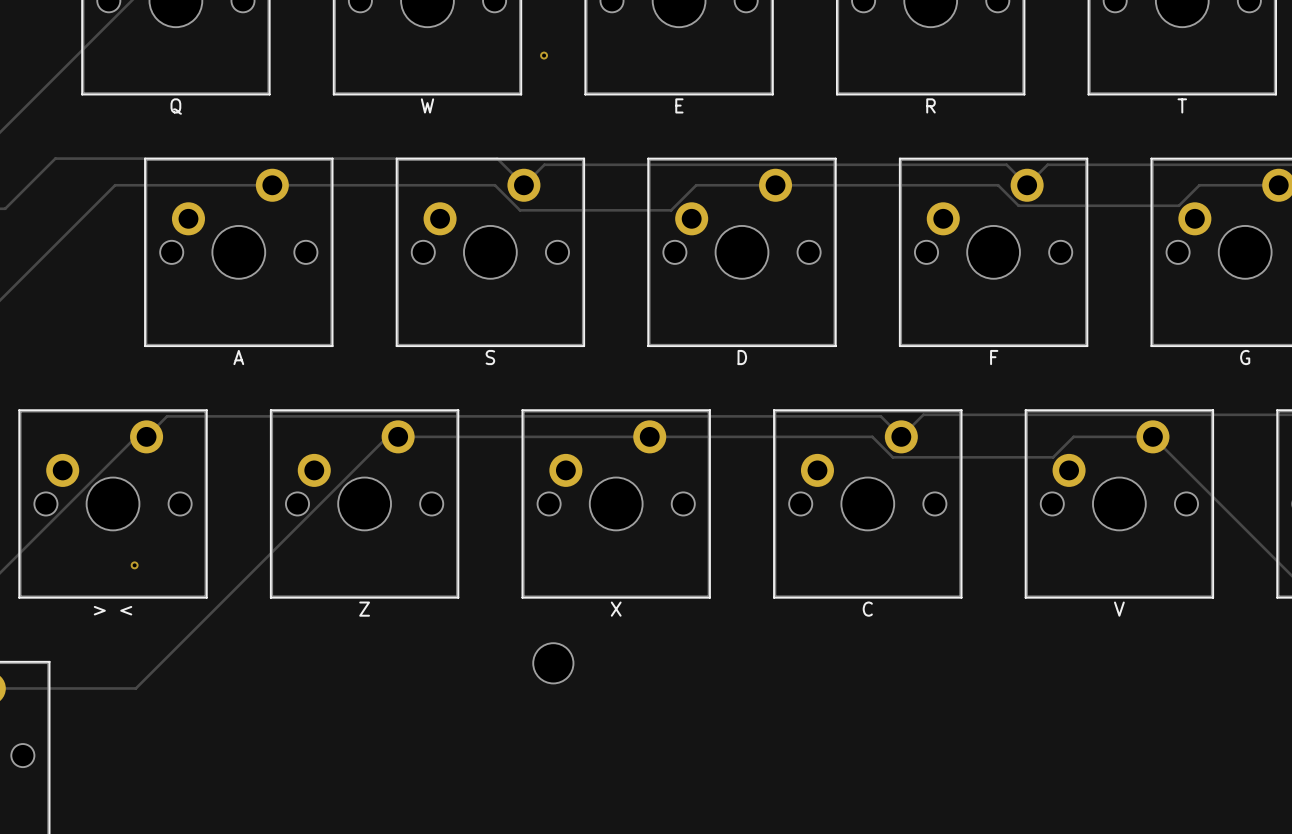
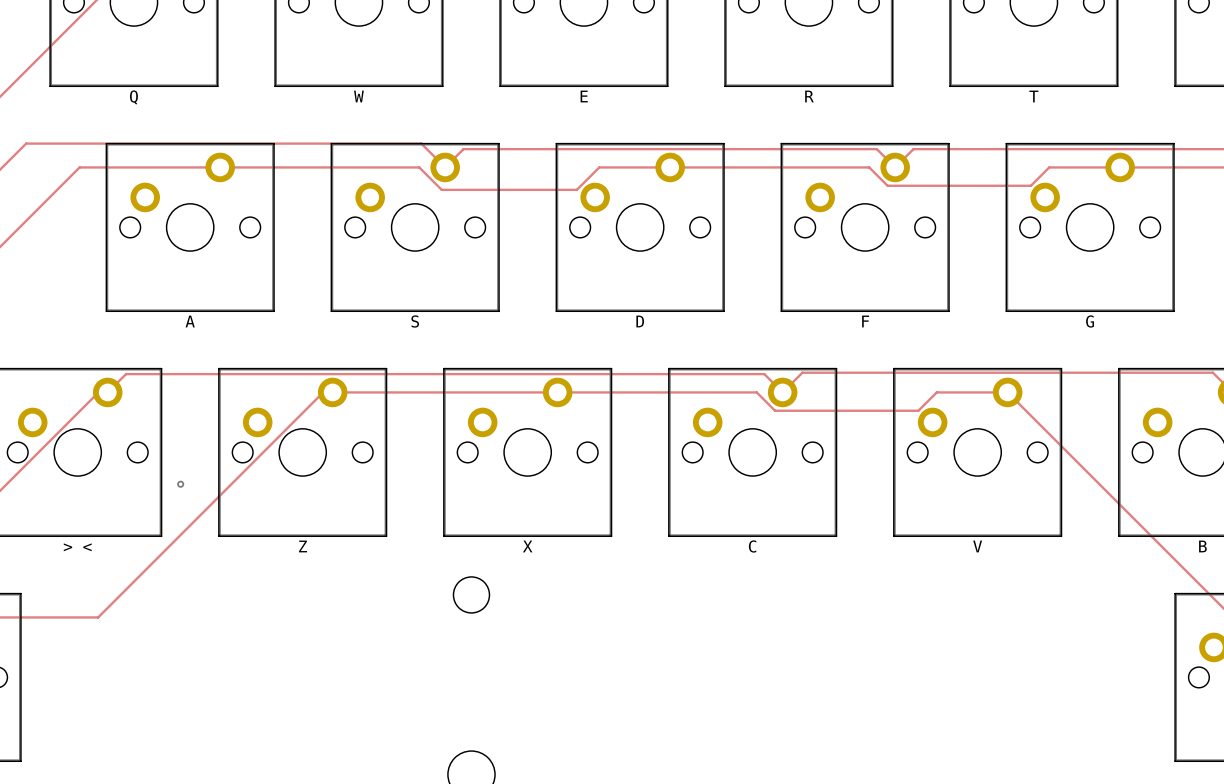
via: (544, 55) -> none
via: none -> (180, 484)
via: (134, 565) -> none

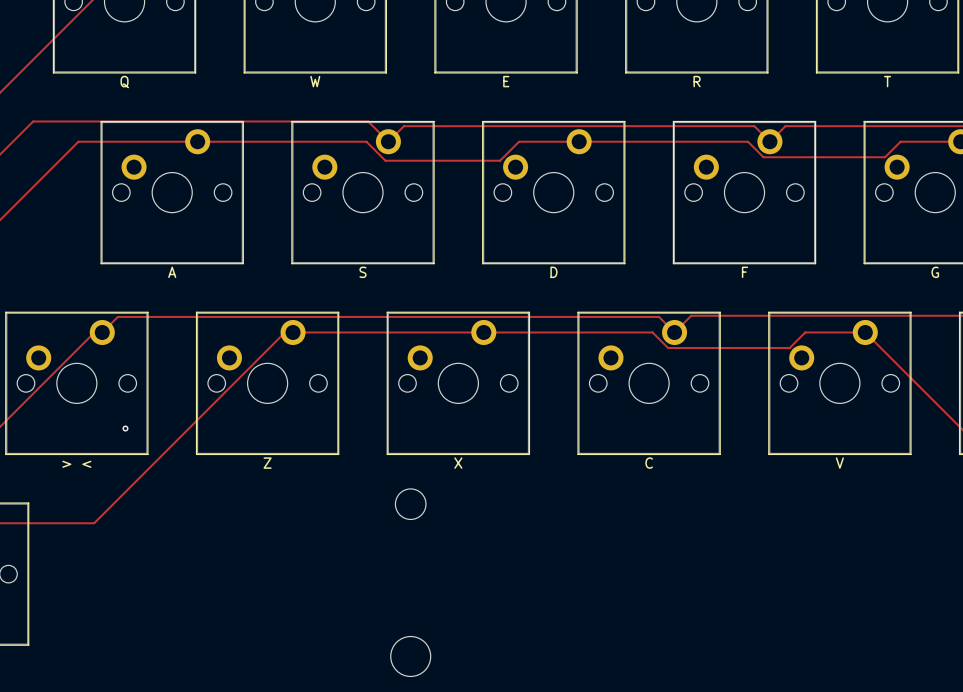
via position: (180, 484) -> (125, 428)

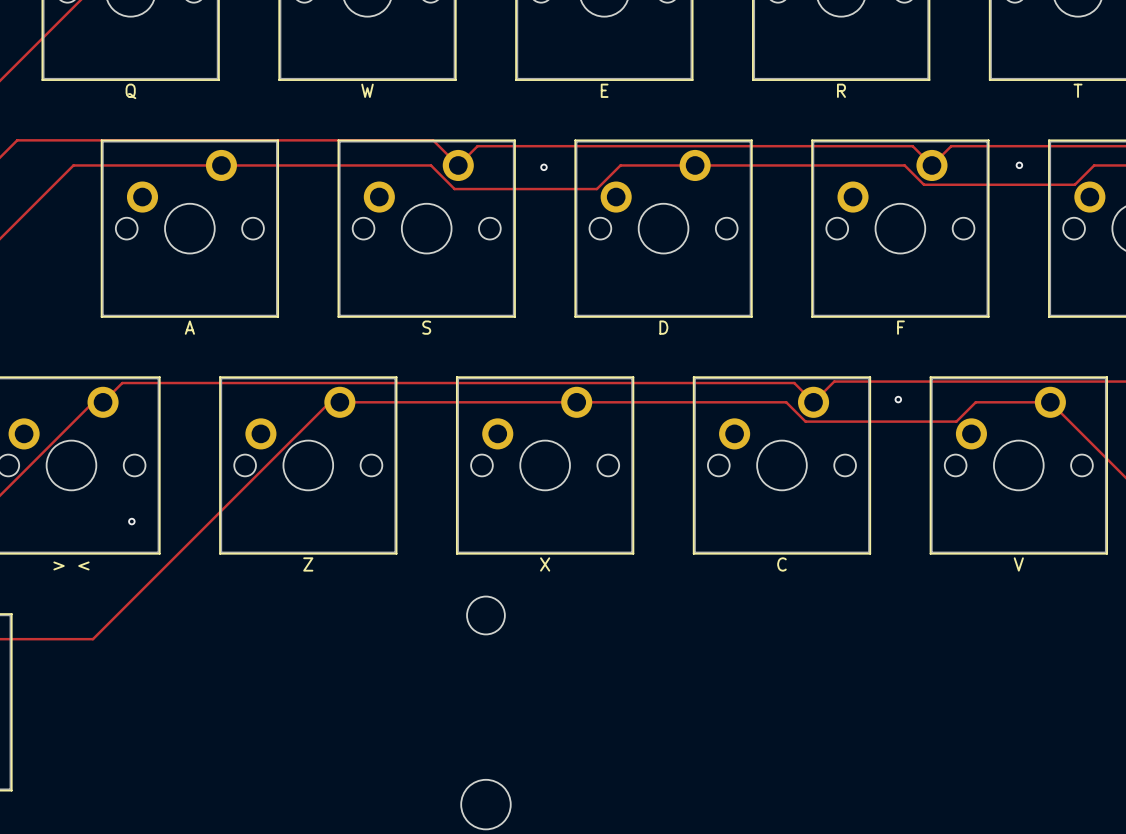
via: none -> (1019, 165)
via: none -> (543, 167)
via: none -> (898, 399)

